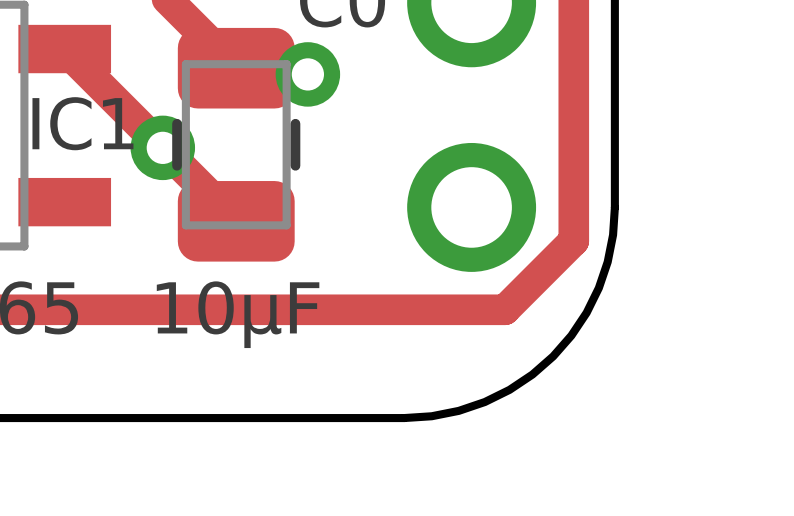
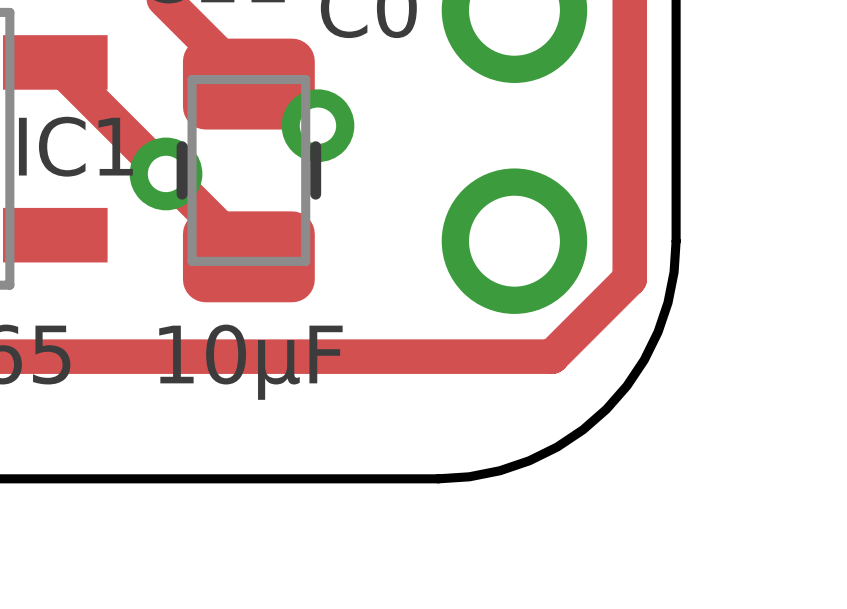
via position: (307, 74) -> (317, 125)

